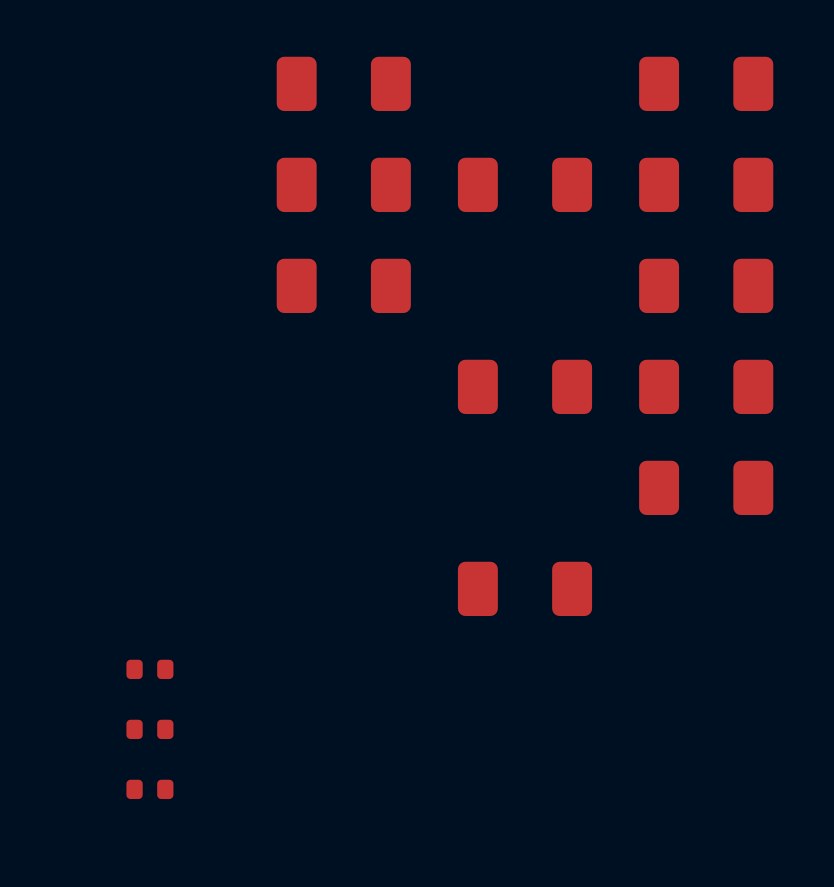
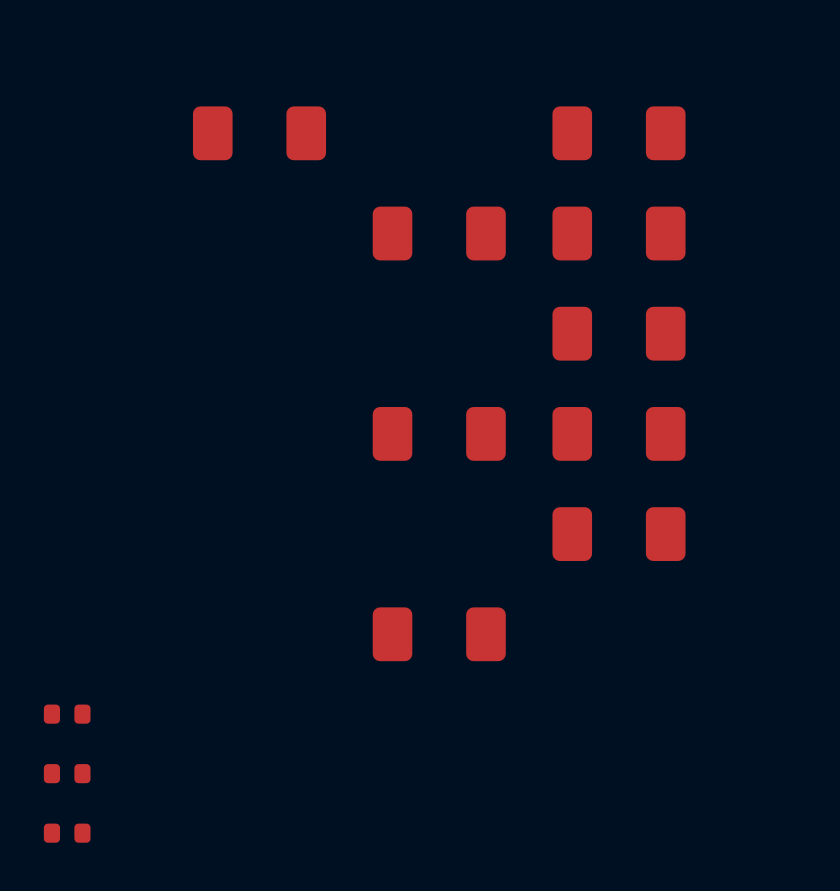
part: (343, 184) -> none
part: (343, 285) -> none

